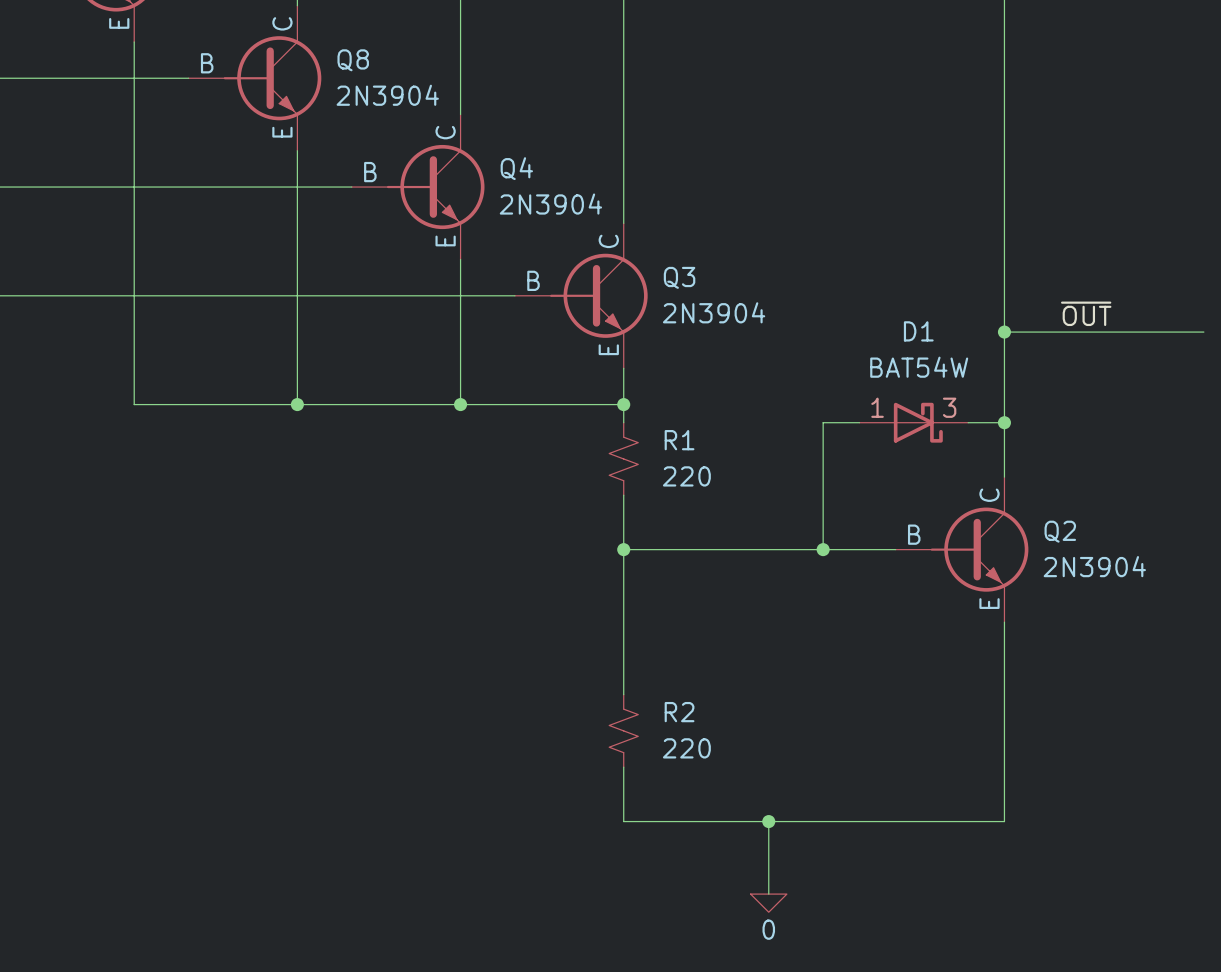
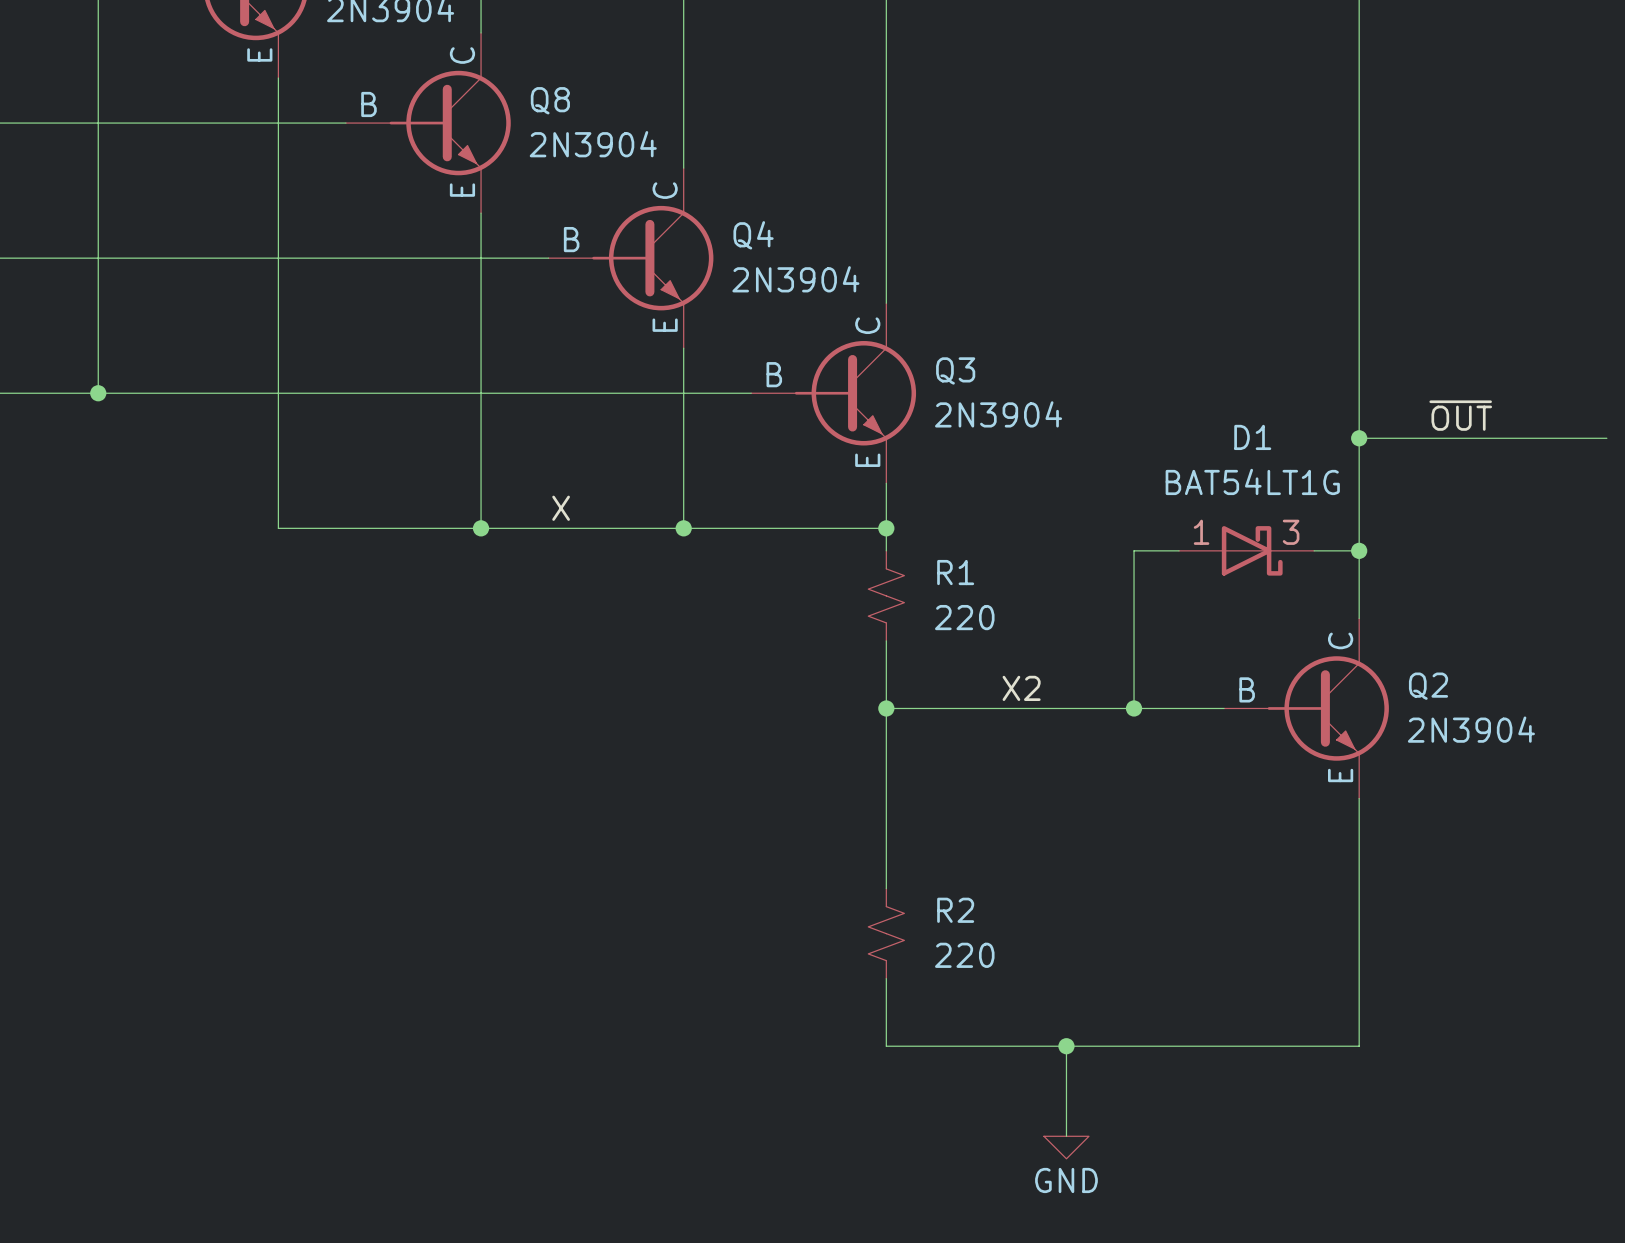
D1 value: BAT54W (919, 367) -> BAT54LT1G (1252, 481)
label: none -> X (561, 508)
label: none -> X2 (1021, 688)
power symbol: 0 (768, 903) -> GND (1066, 1147)

